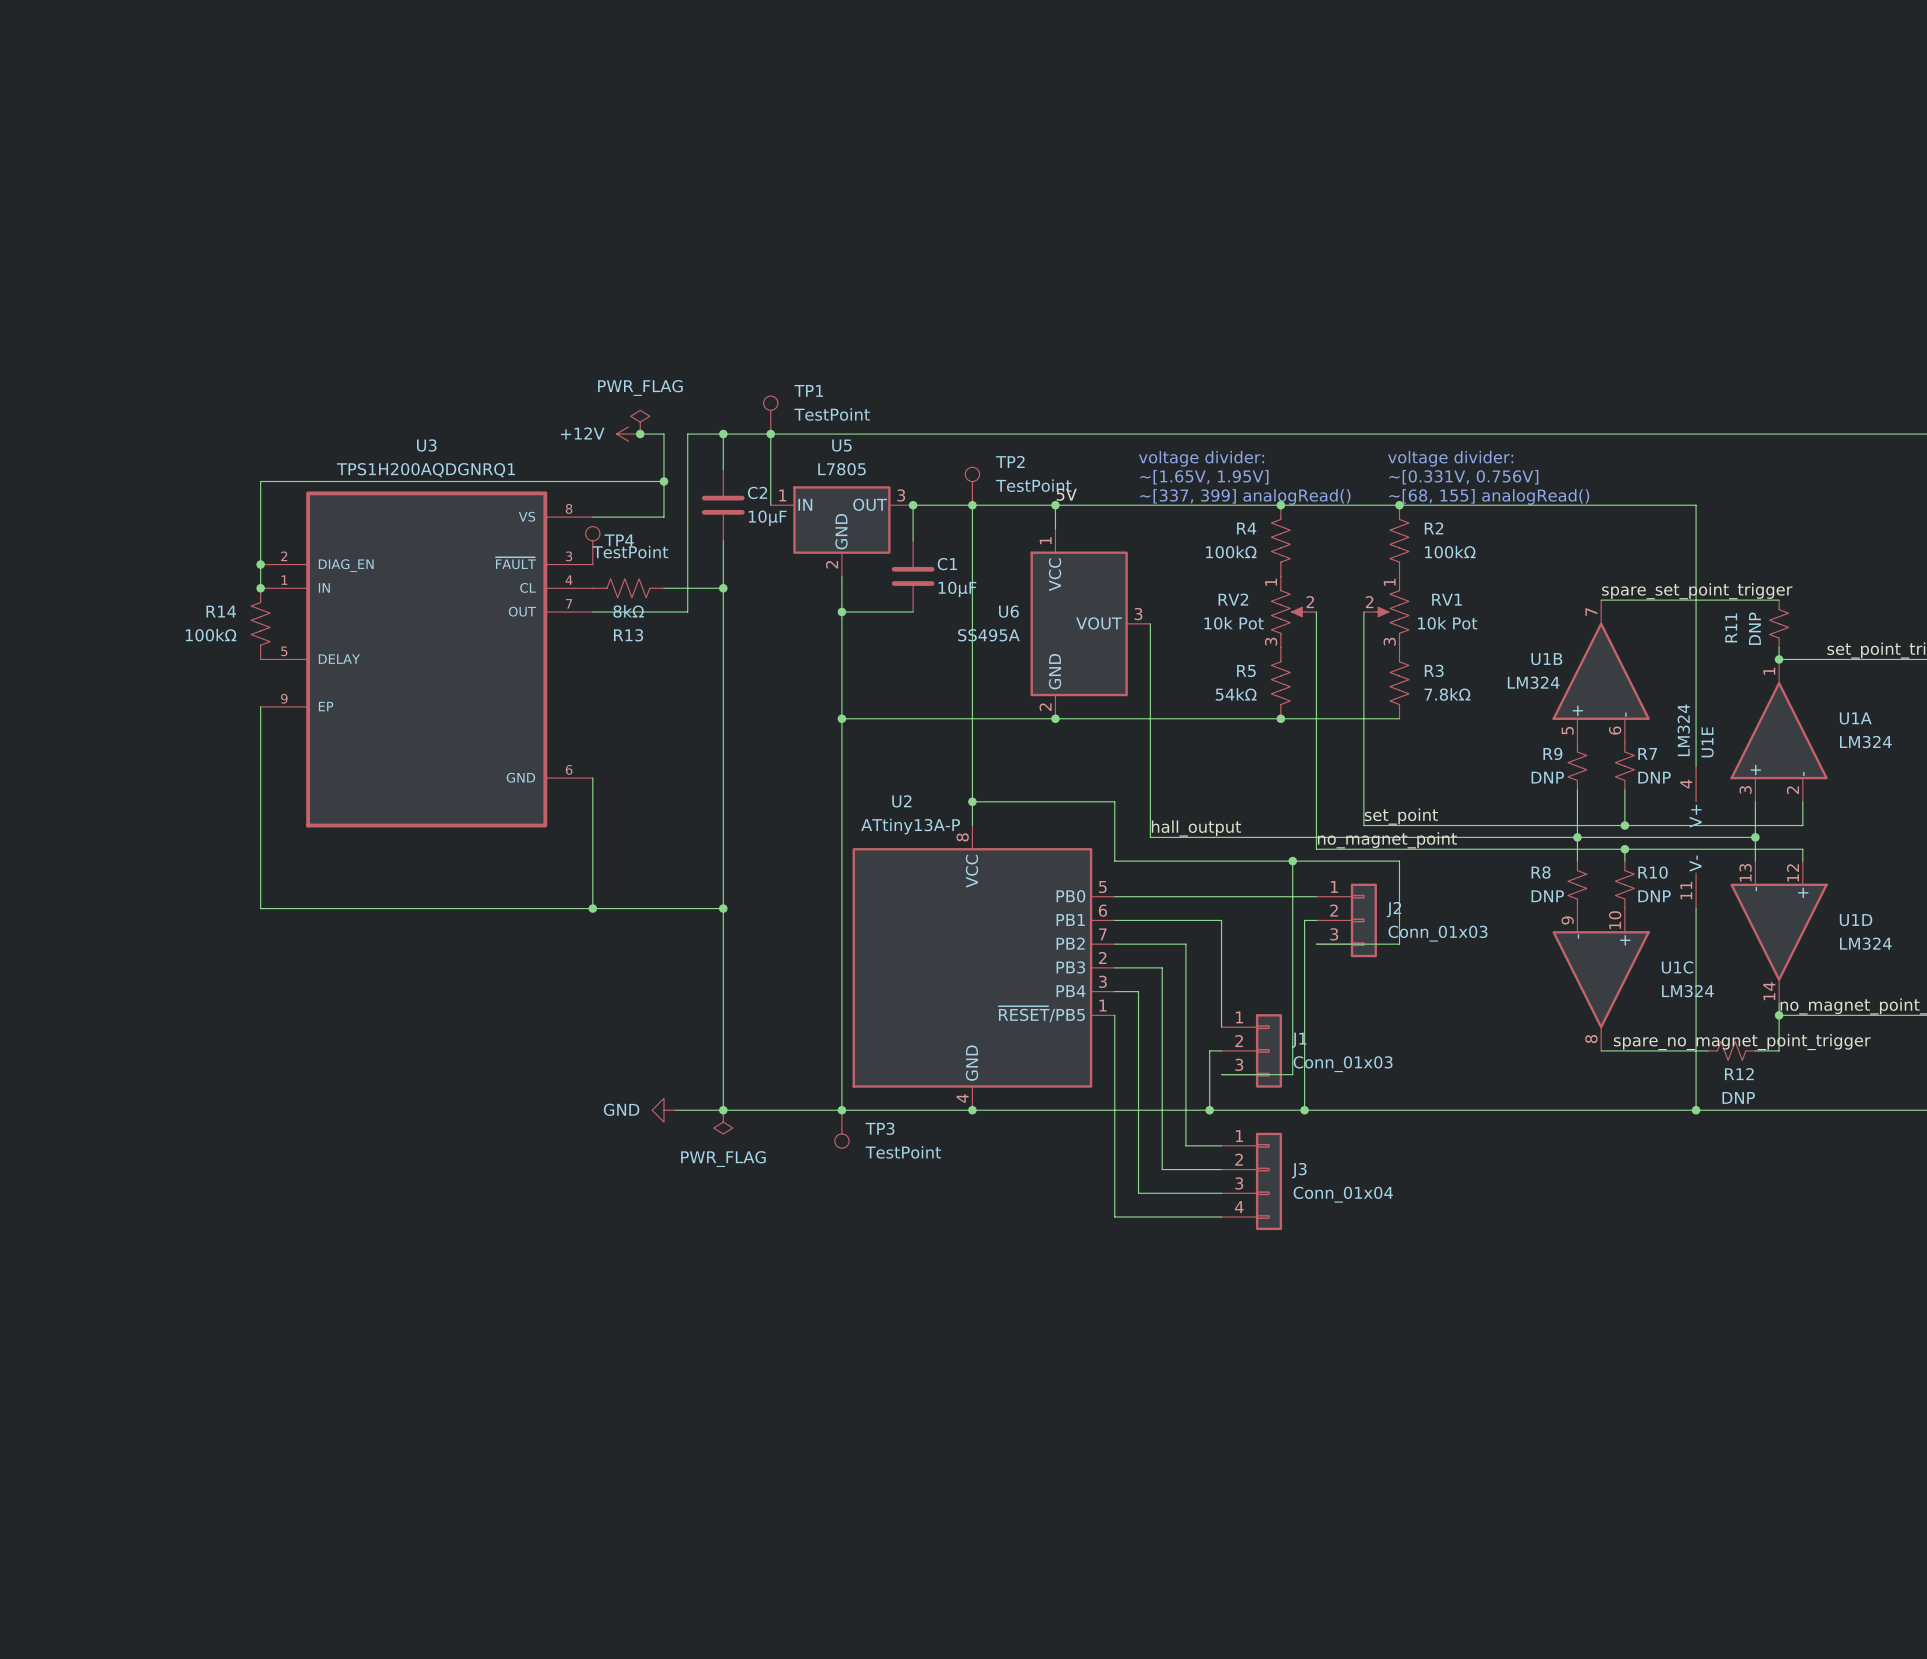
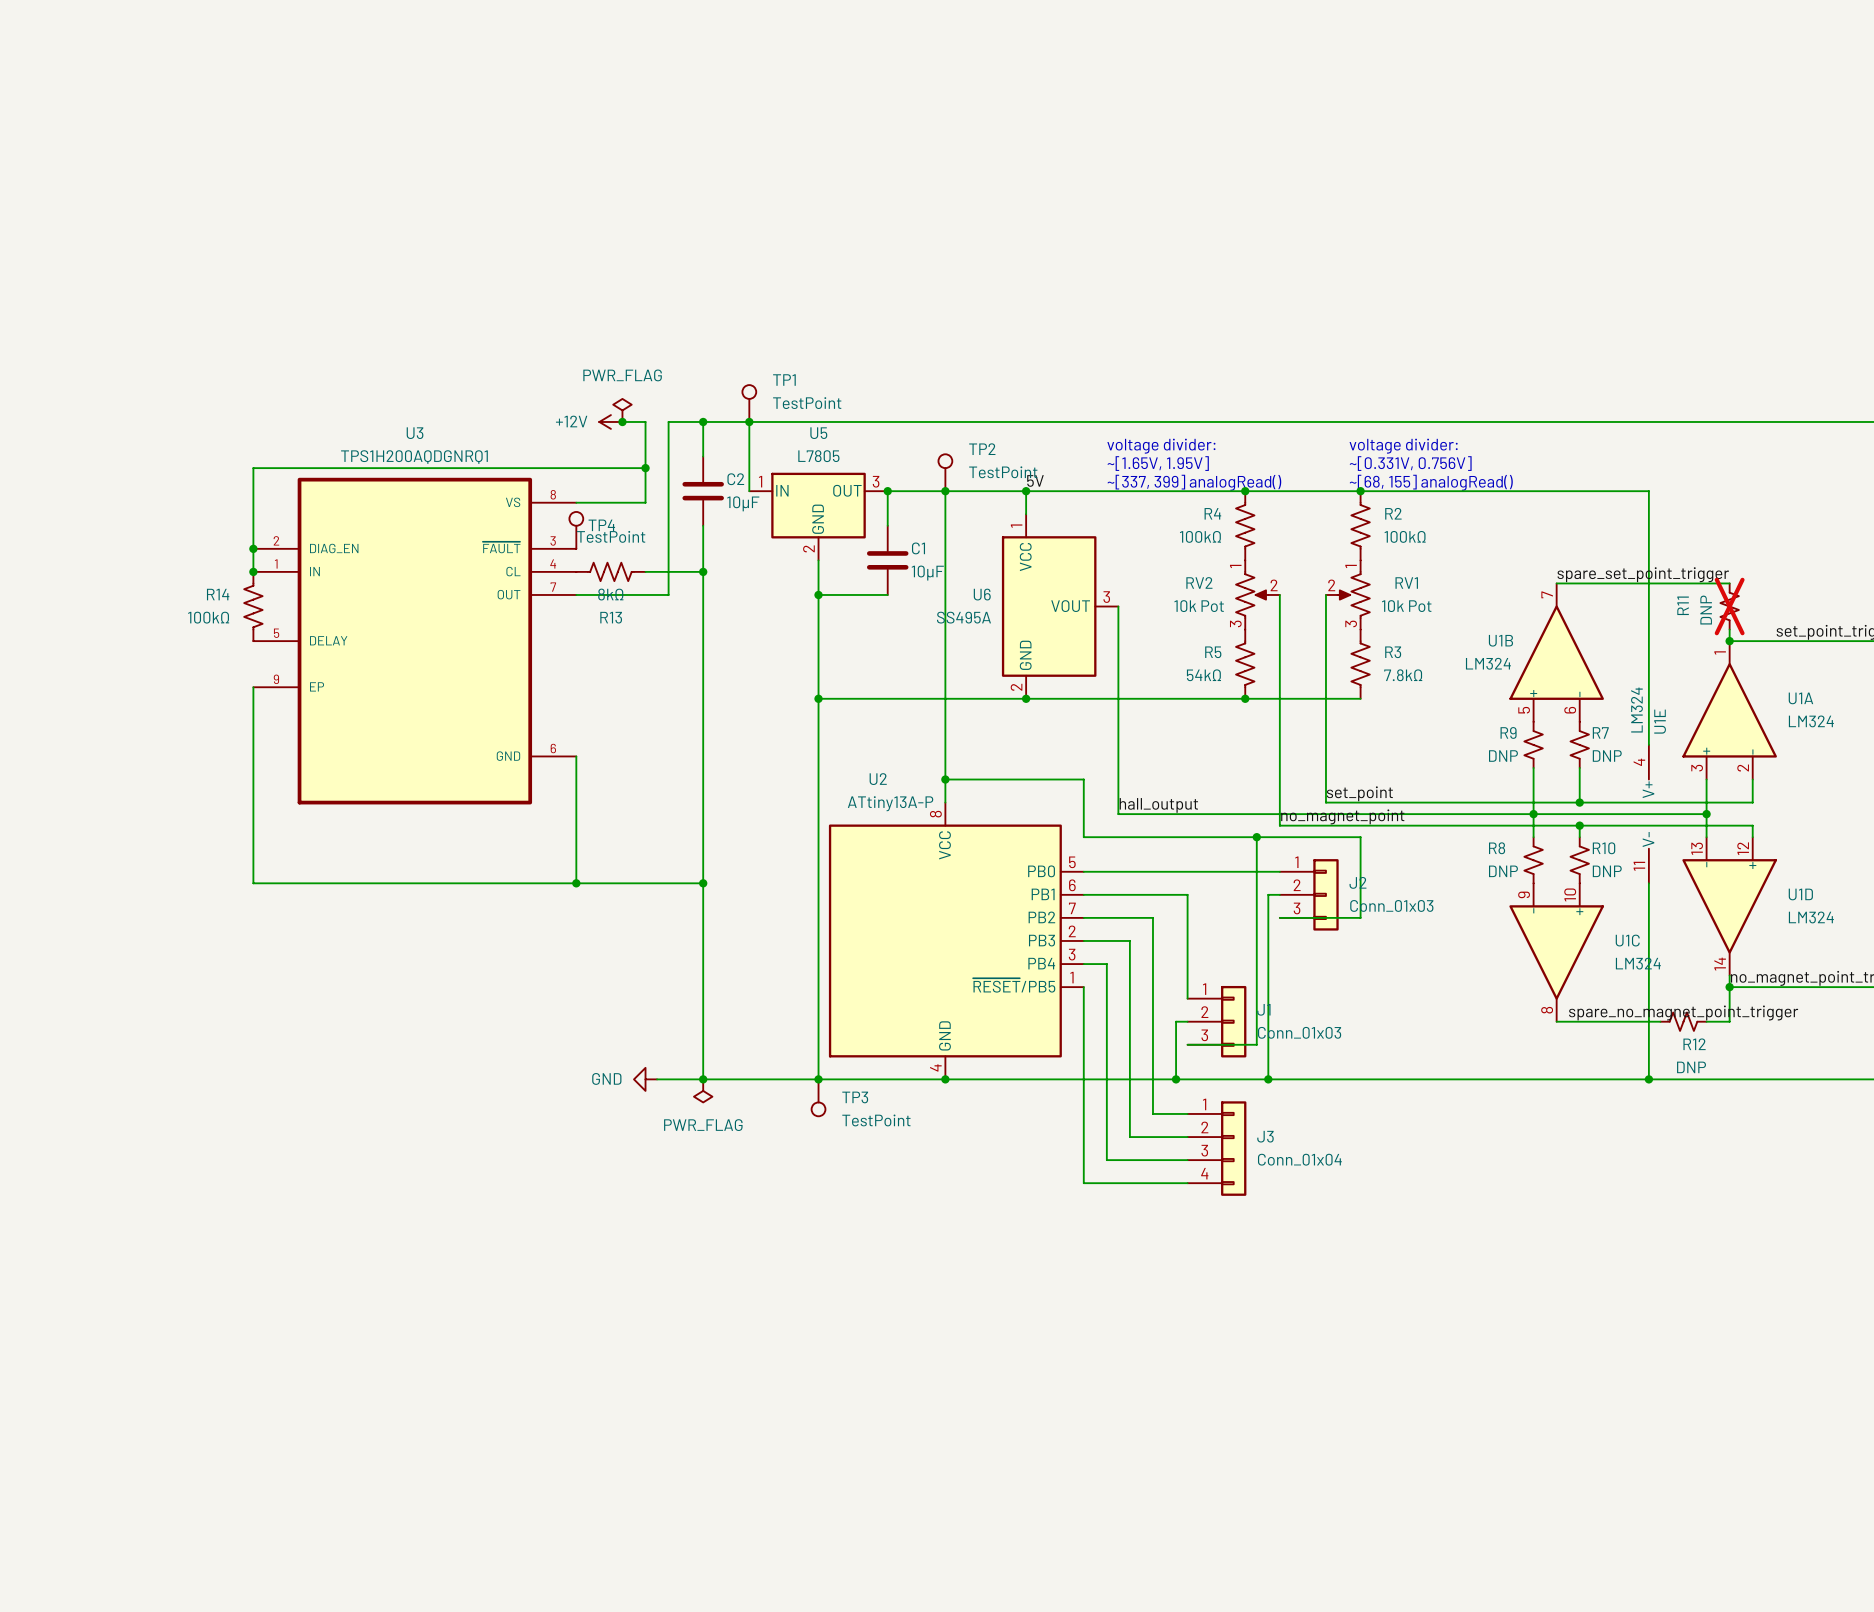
R11 do-not-place cross: none -> (1729, 606)

